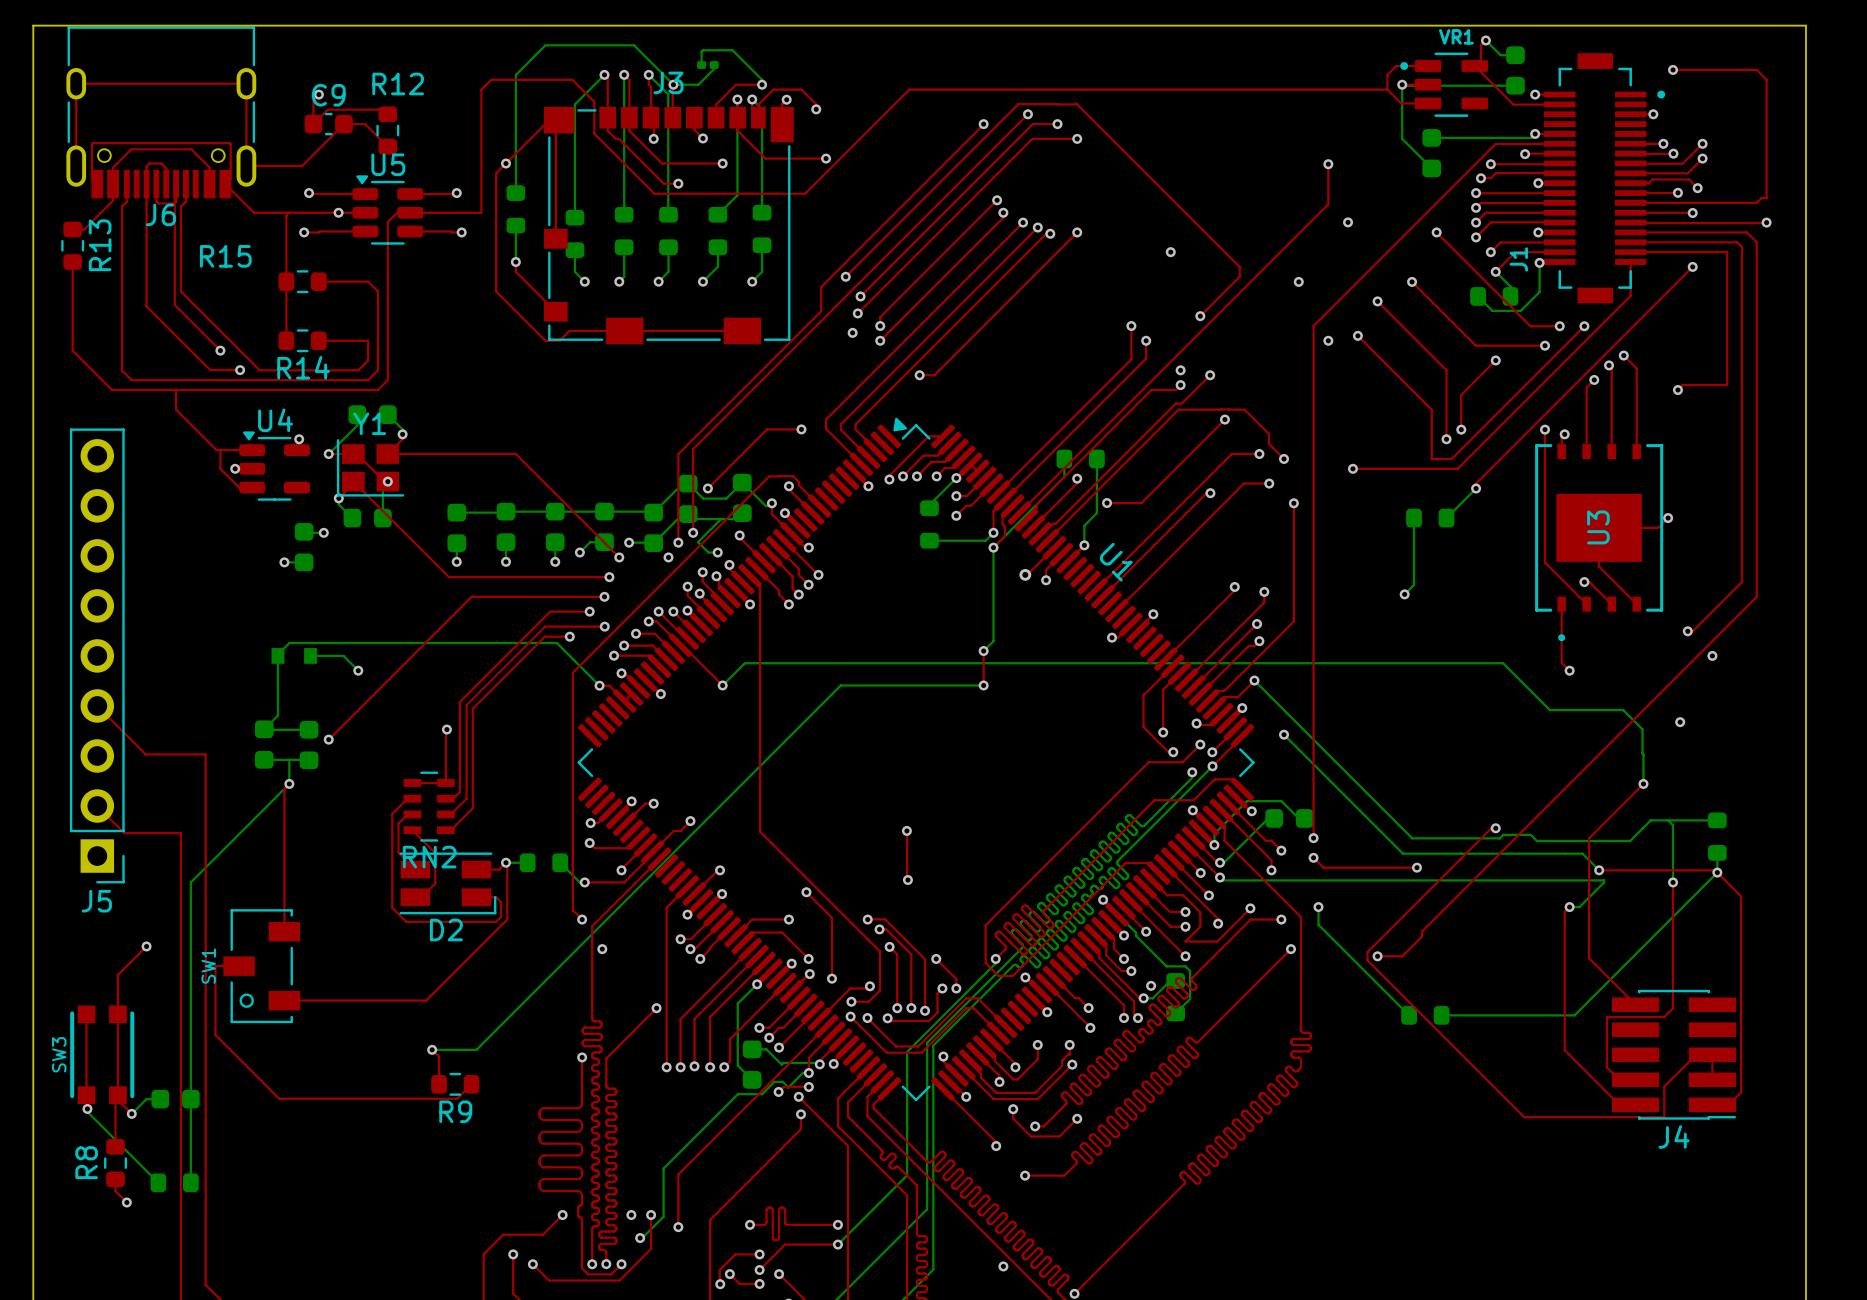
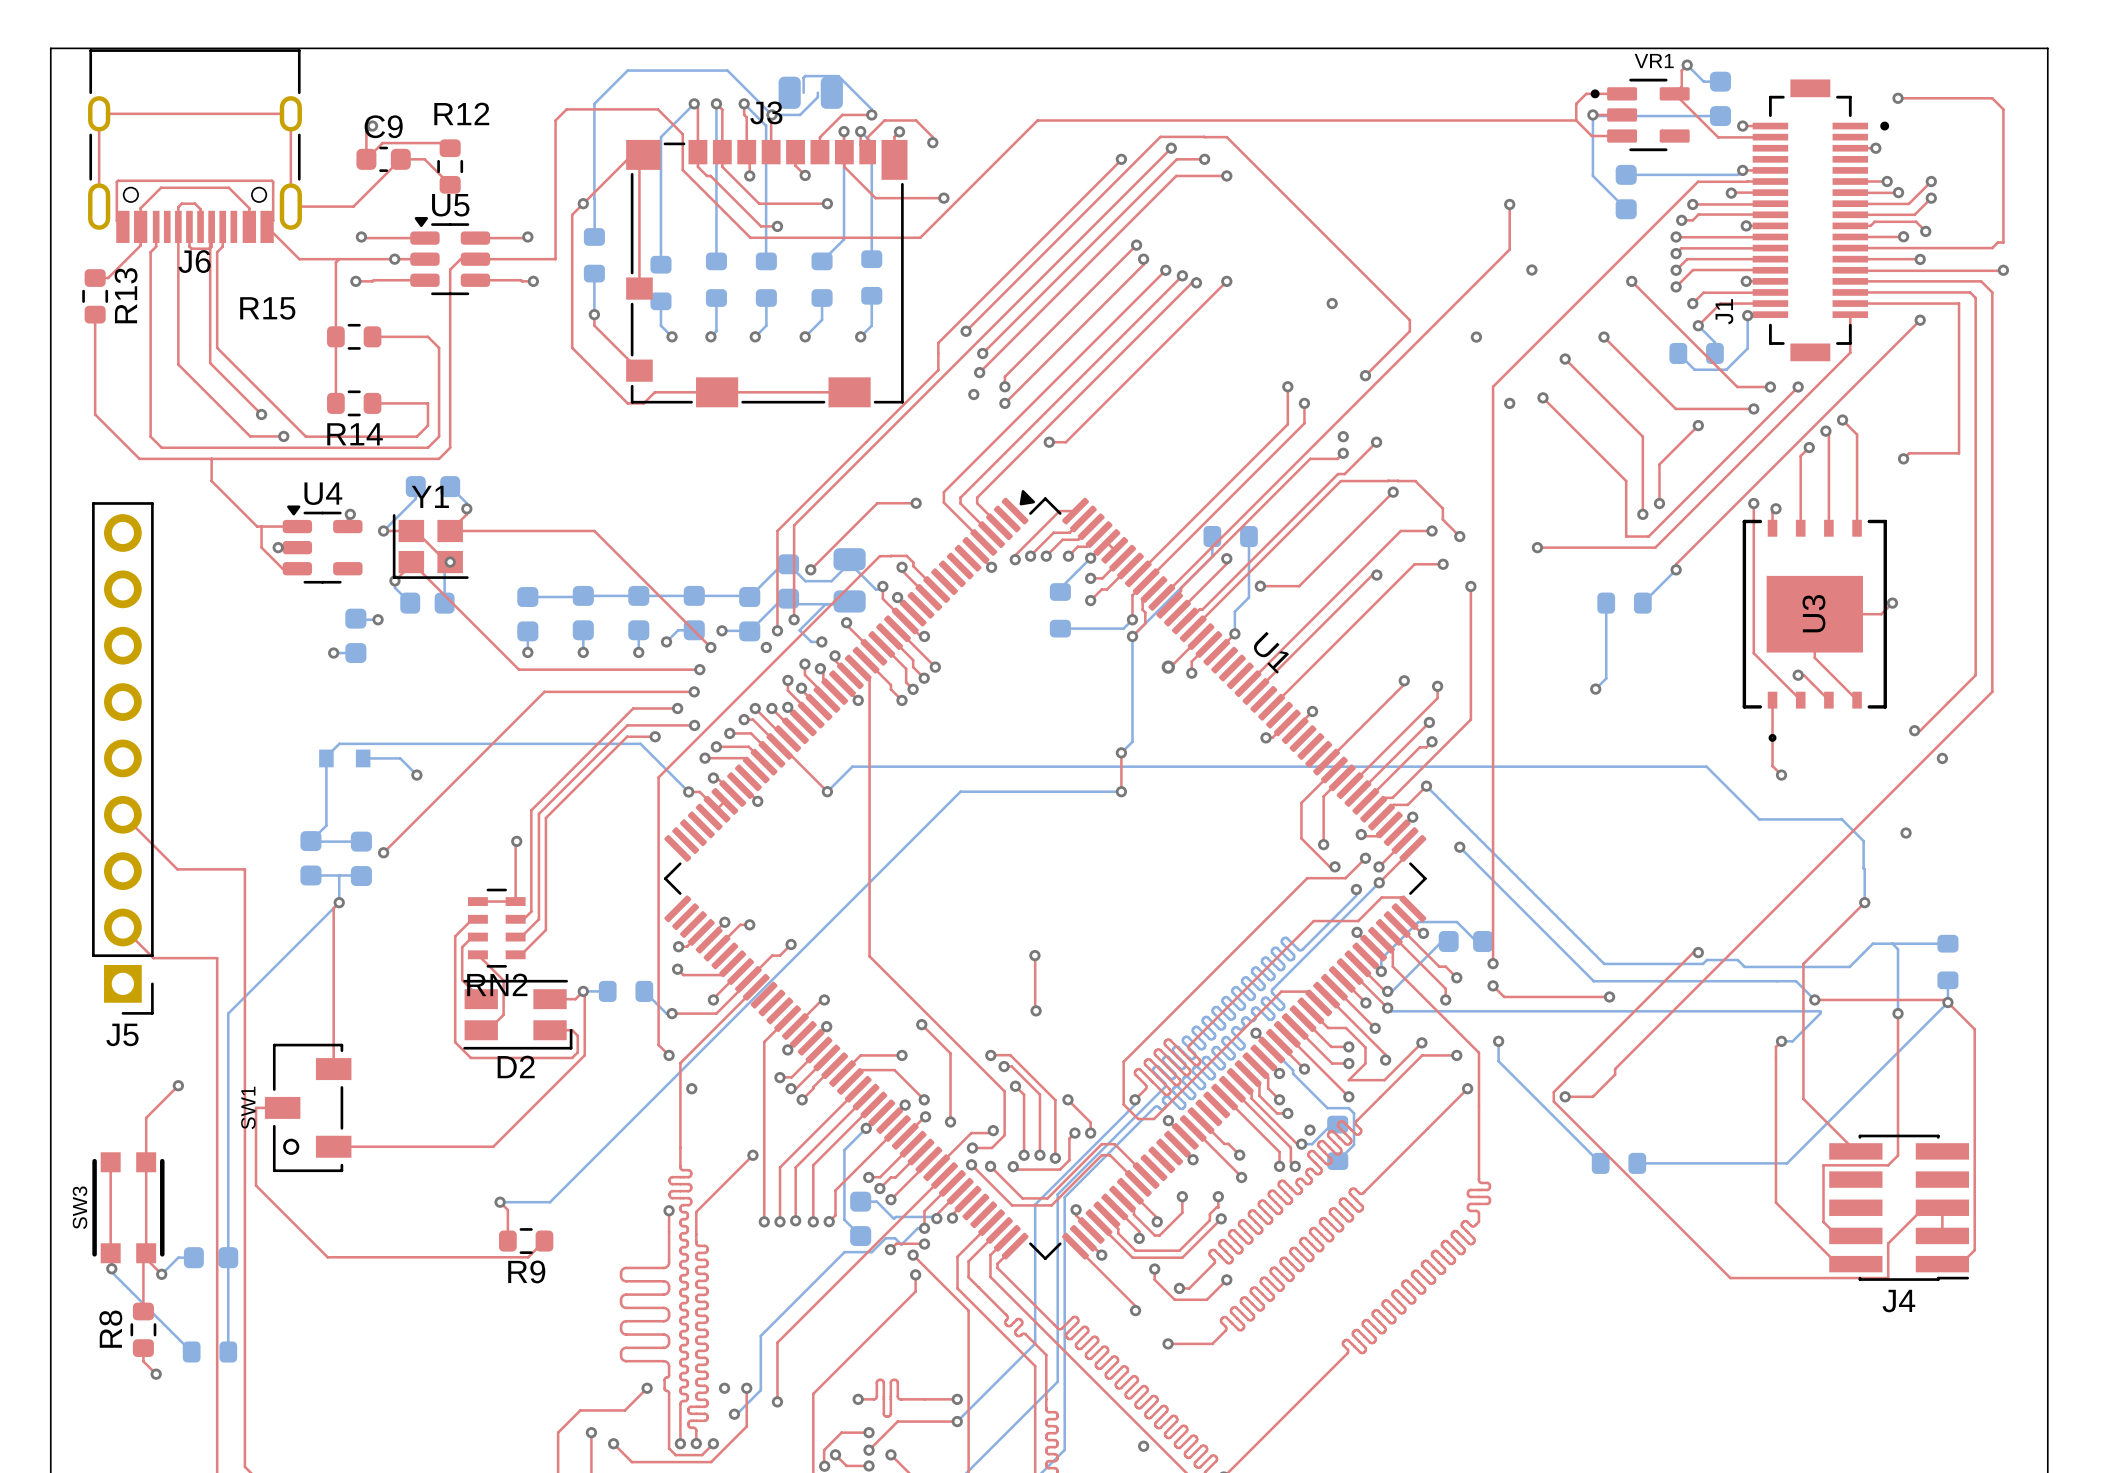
part footprint: [697, 61, 719, 69] -> [778, 76, 843, 109]
part footprint: [733, 473, 752, 522] -> [833, 548, 866, 613]

